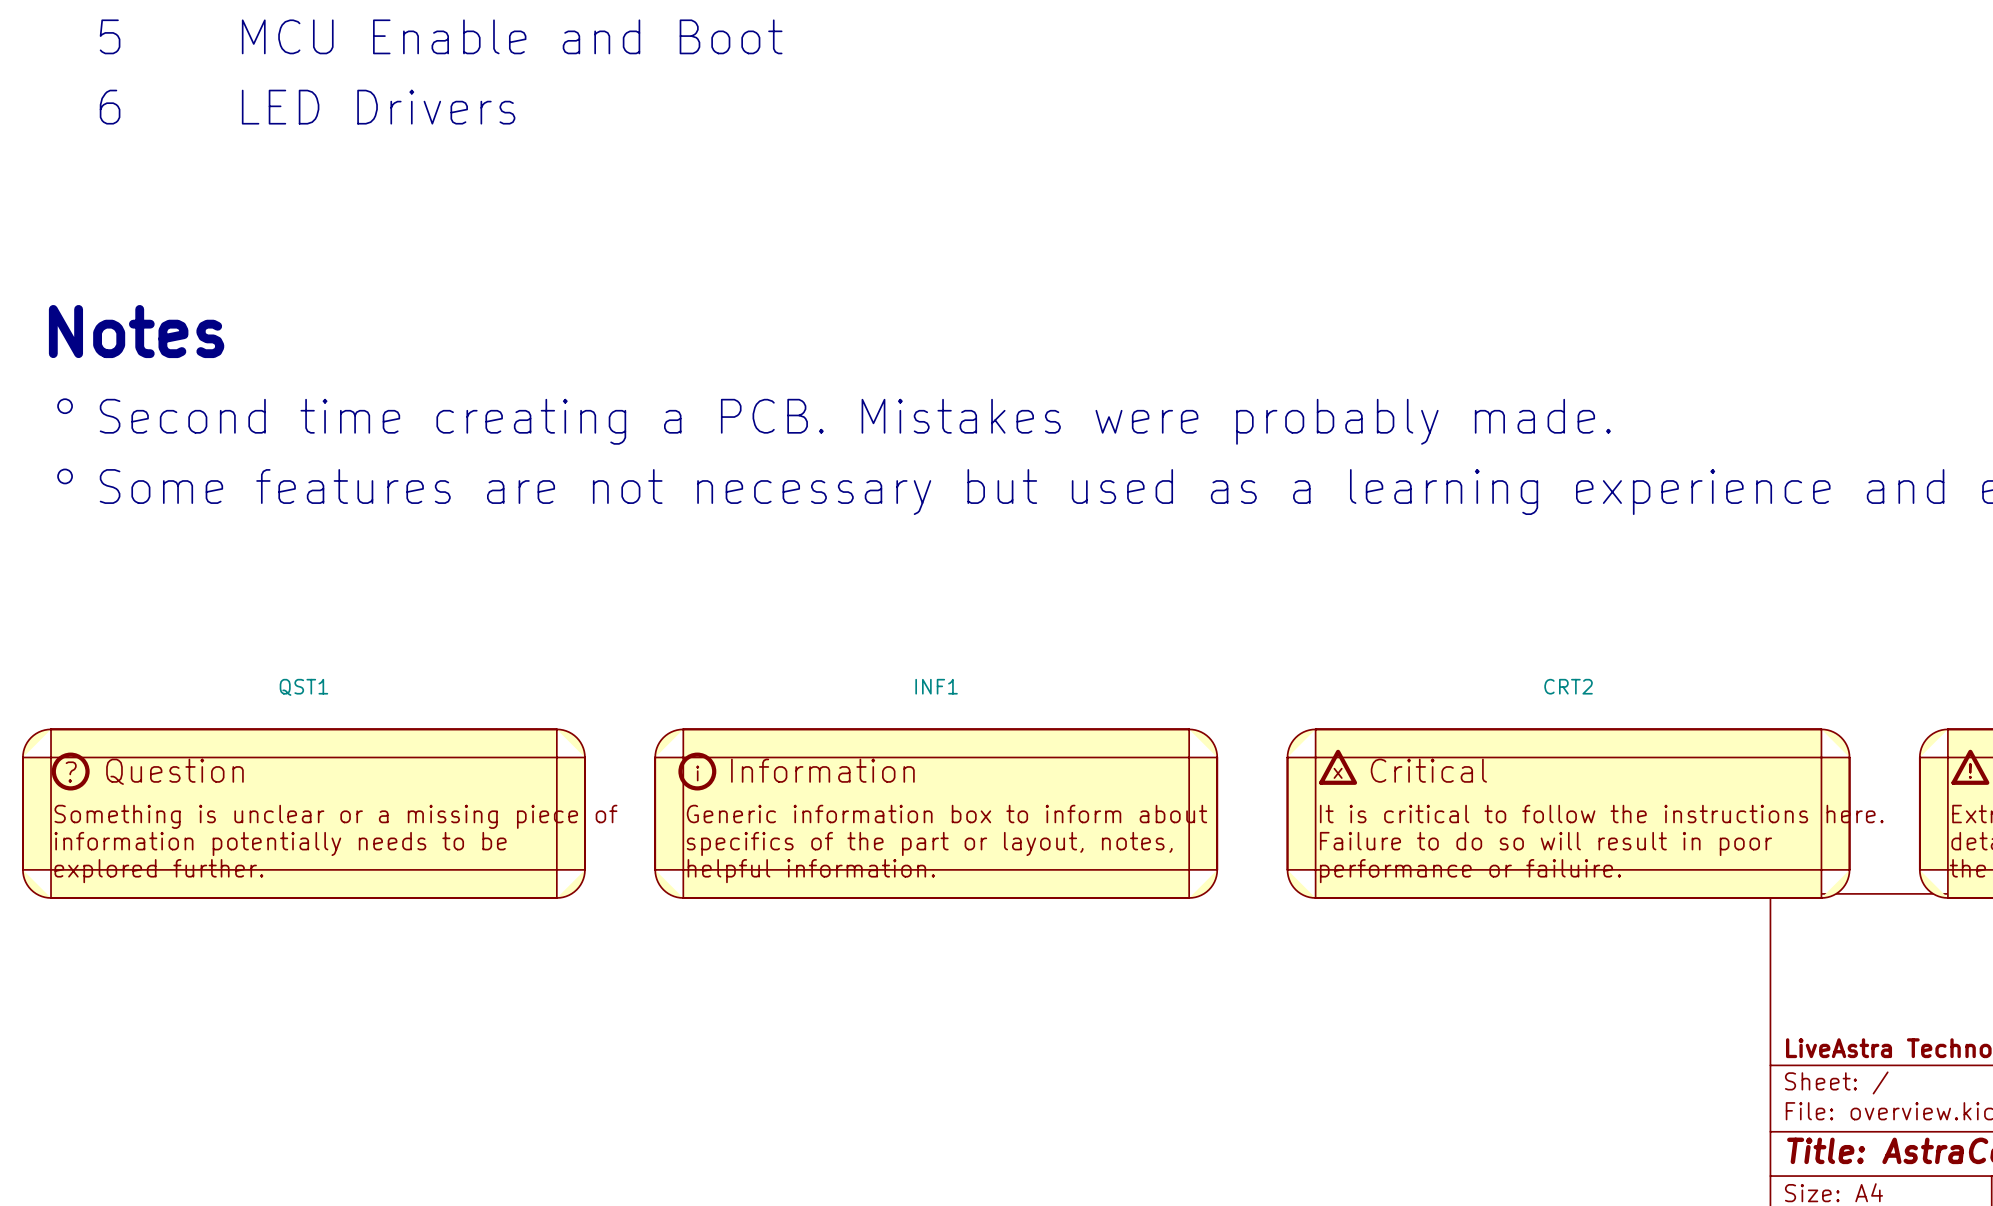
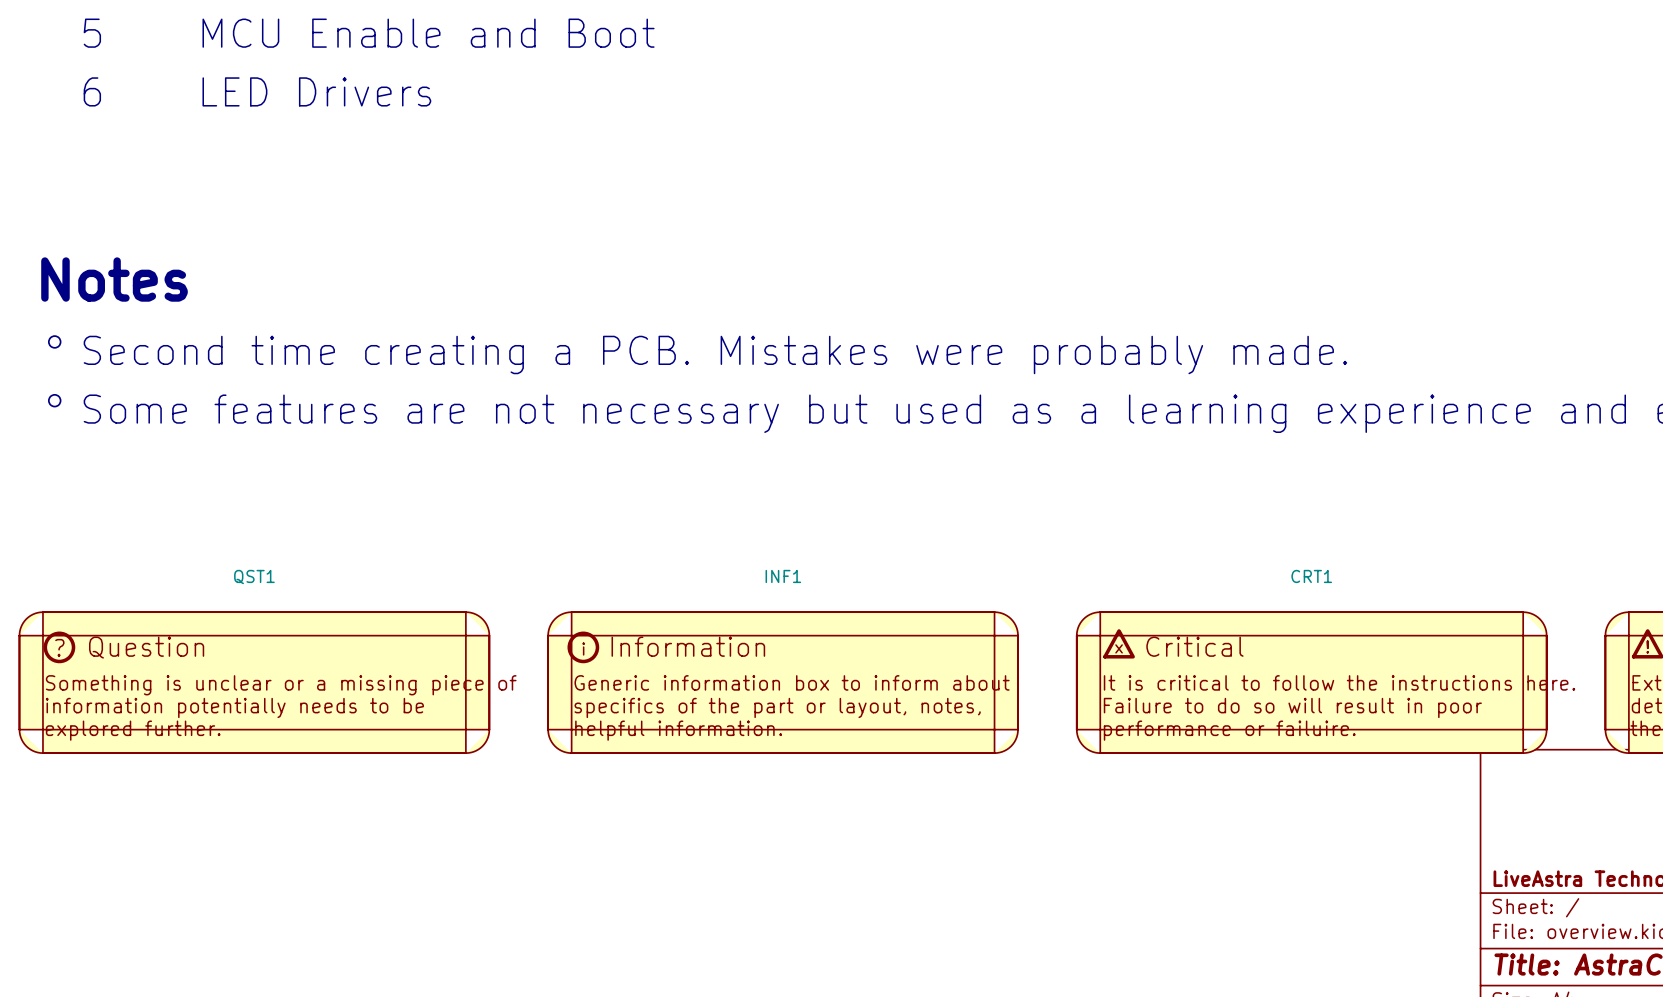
CRT2 name: CRT2 (1568, 686) -> CRT1 (1311, 576)

